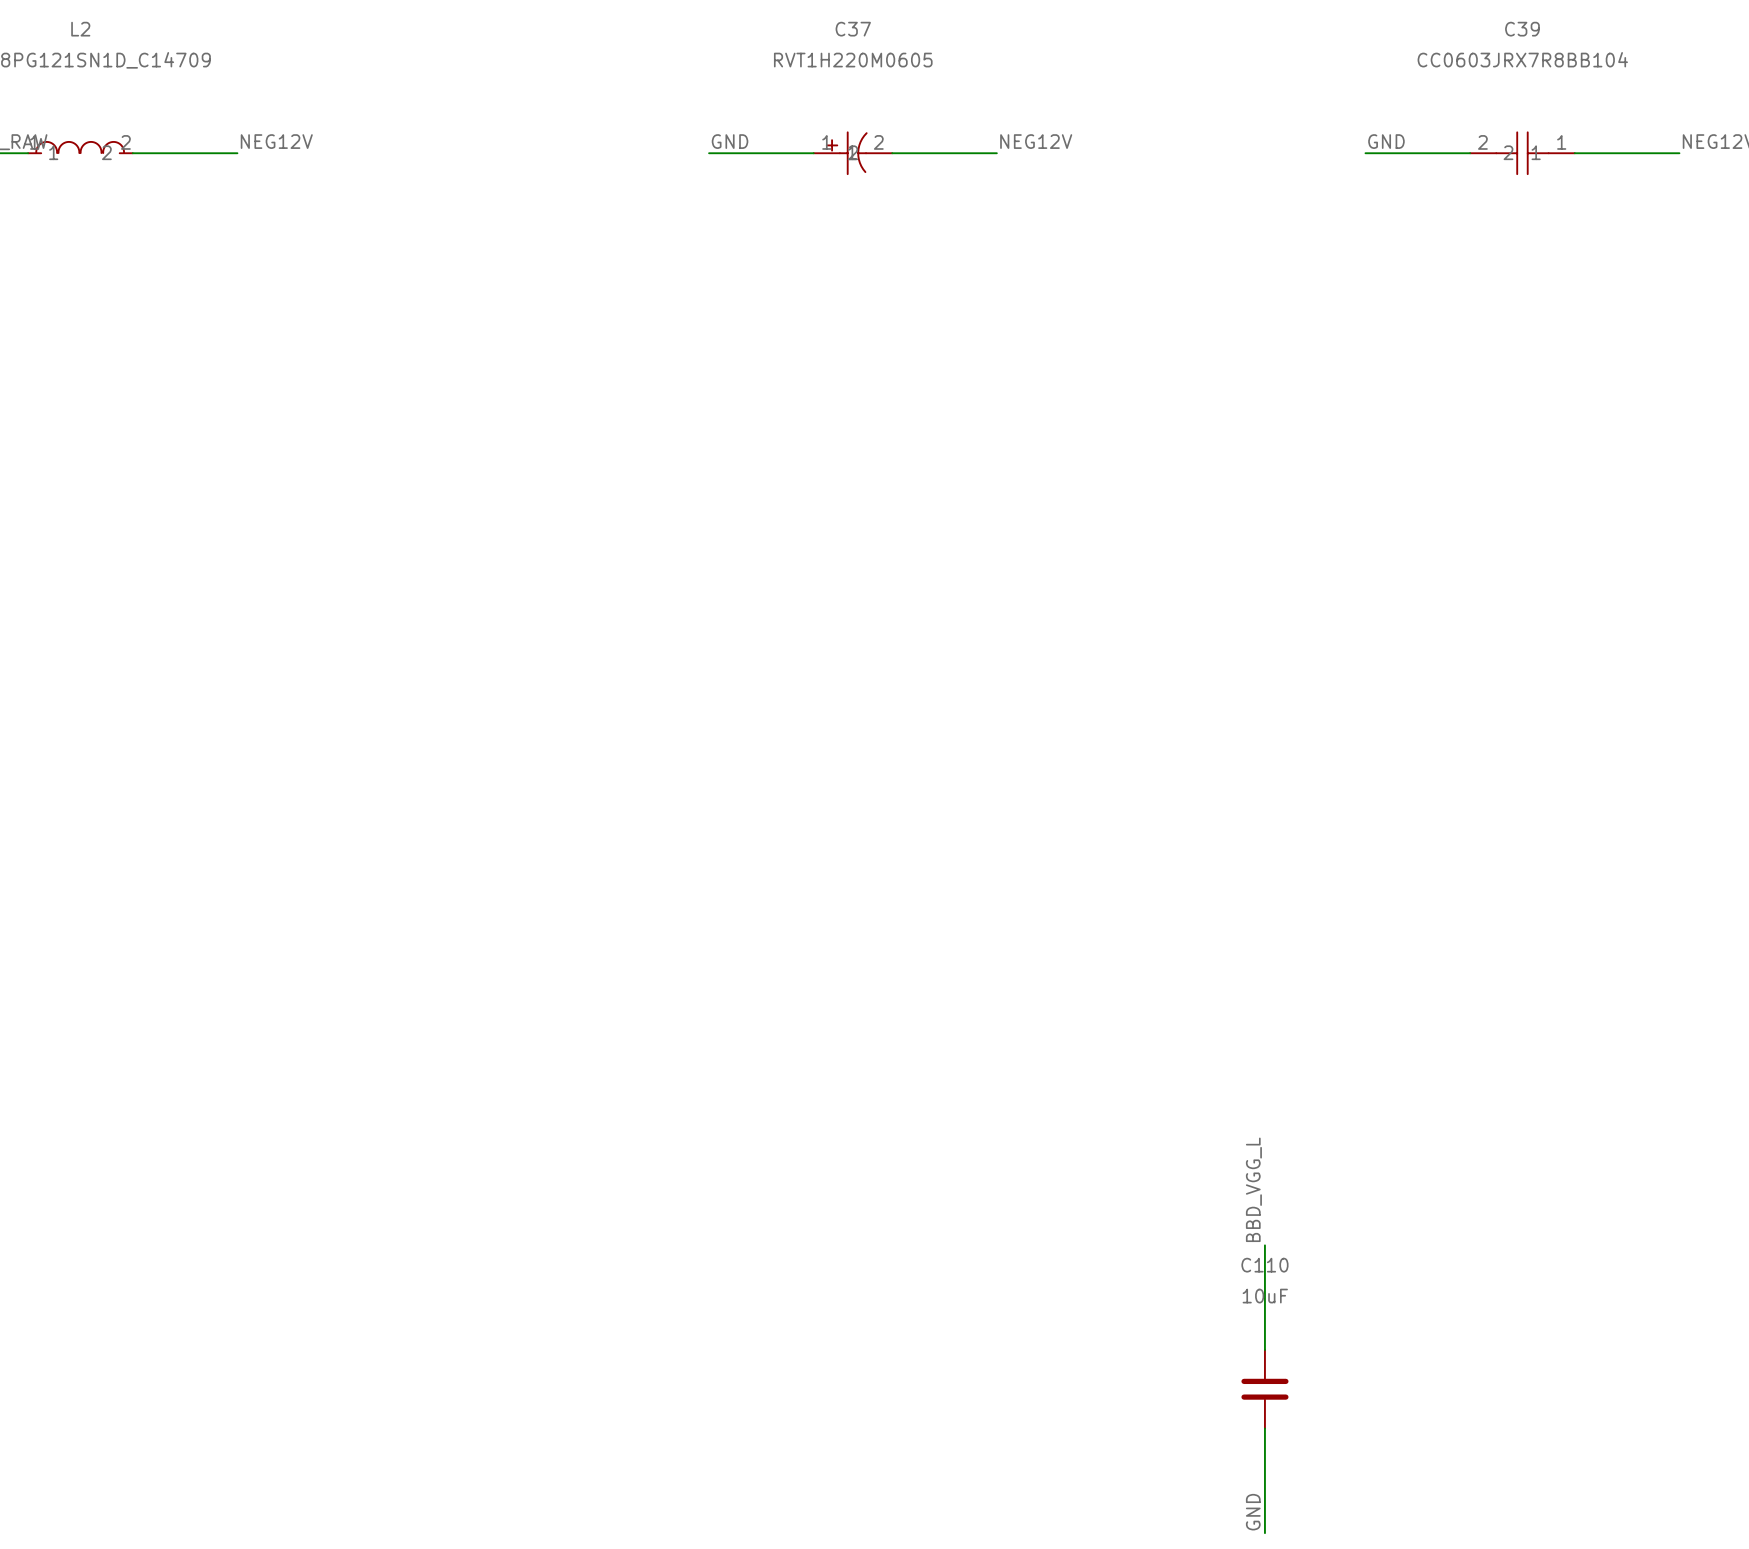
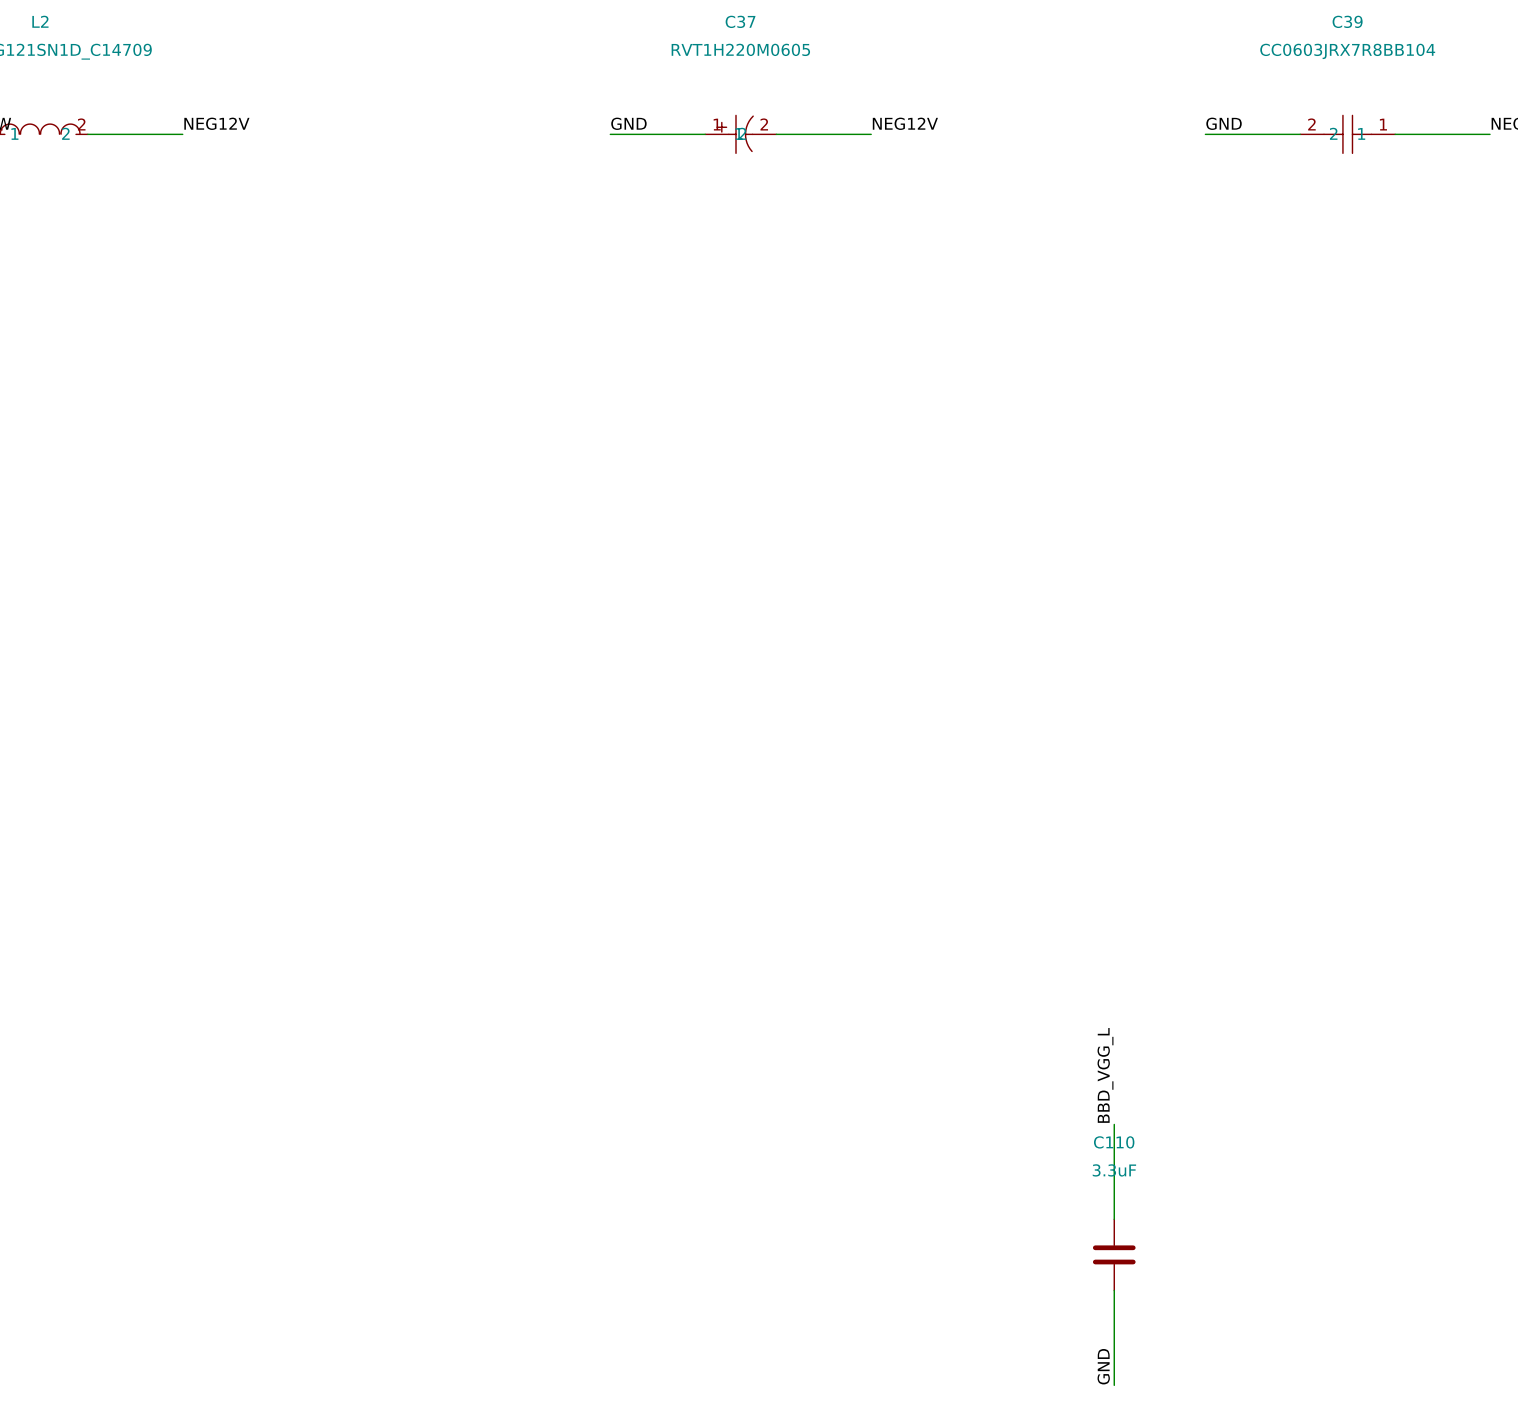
C110 value: 10uF (1265, 1296) -> 3.3uF (1114, 1170)

